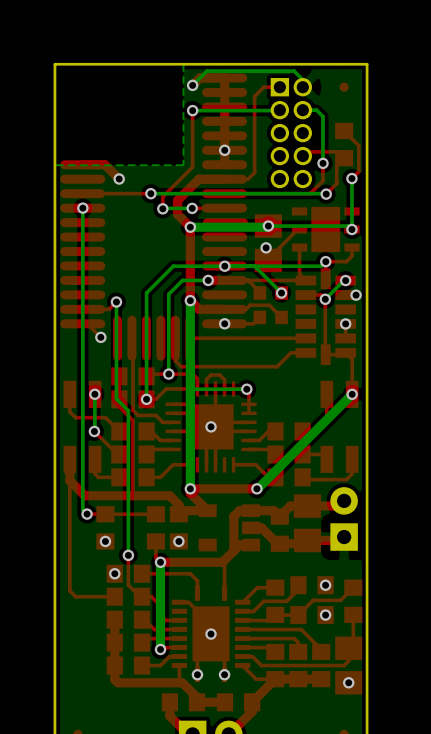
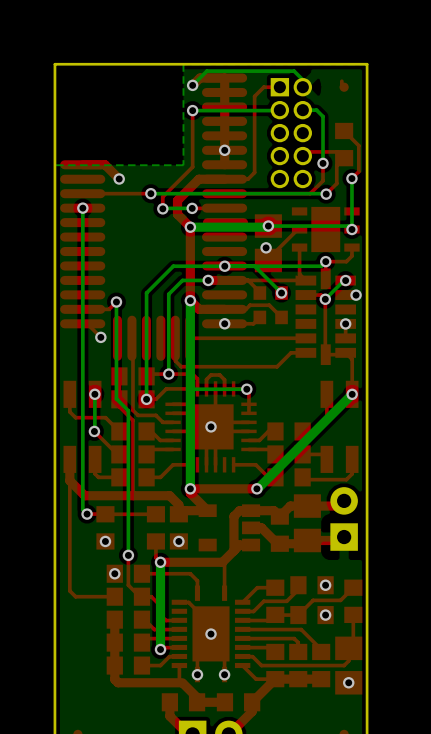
top track: none -> (341, 81) (341, 84)

